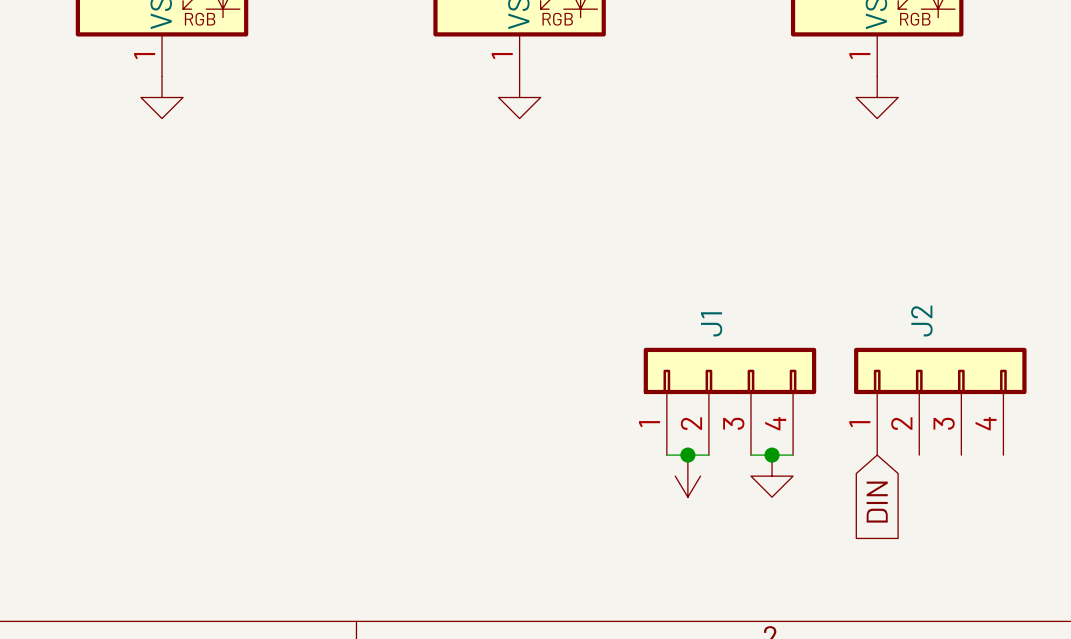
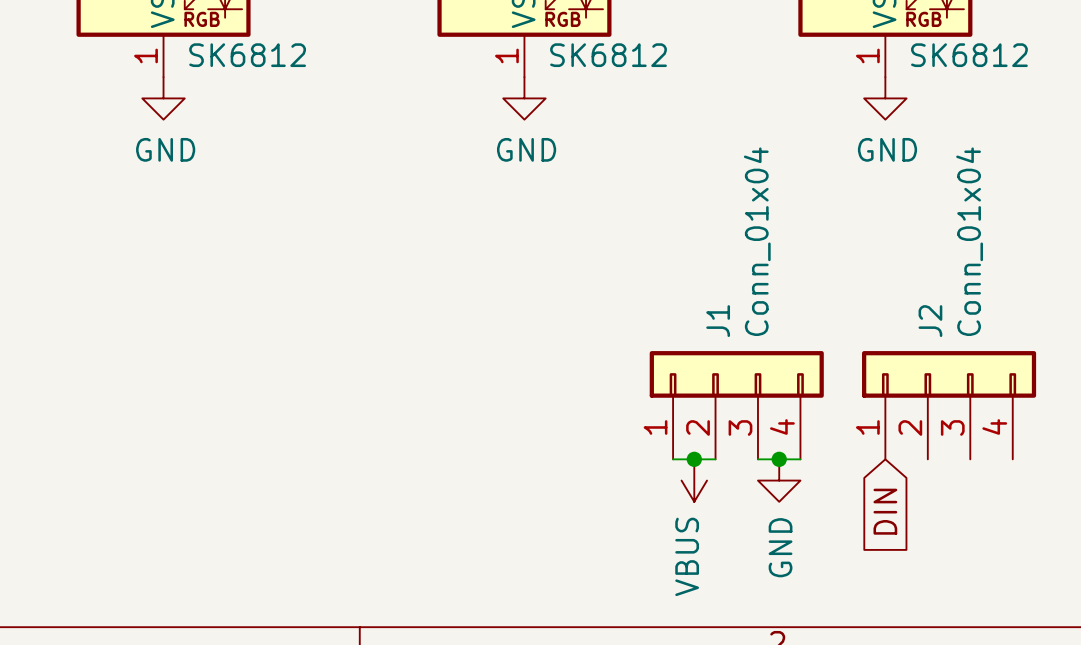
part value: none -> SK6812 (247, 55)
part value: none -> SK6812 (608, 55)
part value: none -> SK6812 (969, 55)
power symbol text: none -> GND (165, 149)
power symbol text: none -> GND (526, 149)
power symbol text: none -> GND (887, 149)
J1 value: none -> Conn_01x04 (757, 241)
J2 value: none -> Conn_01x04 (969, 241)
power symbol text: none -> GND (780, 547)
power symbol text: none -> VBUS (687, 556)

